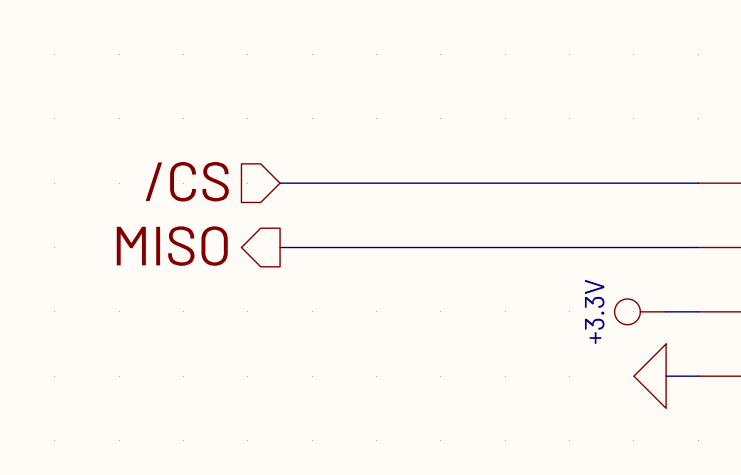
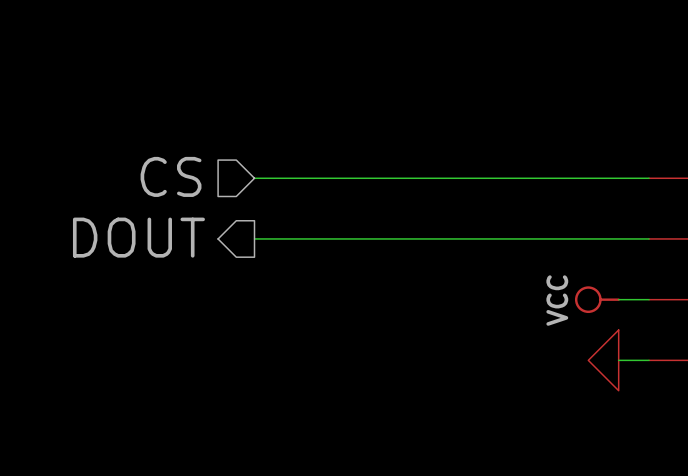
hierarchical label: /CS (187, 181) -> CS (171, 176)
hierarchical label: MISO (172, 246) -> DOUT (138, 237)
power symbol: +3.3V (640, 311) -> VCC (597, 299)

